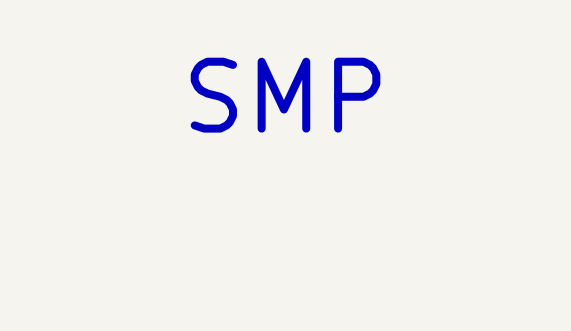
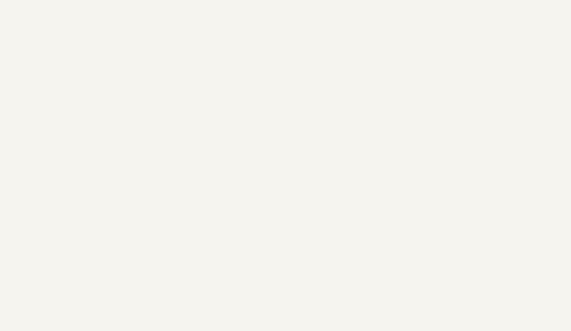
text: SMP (285, 95) -> none

